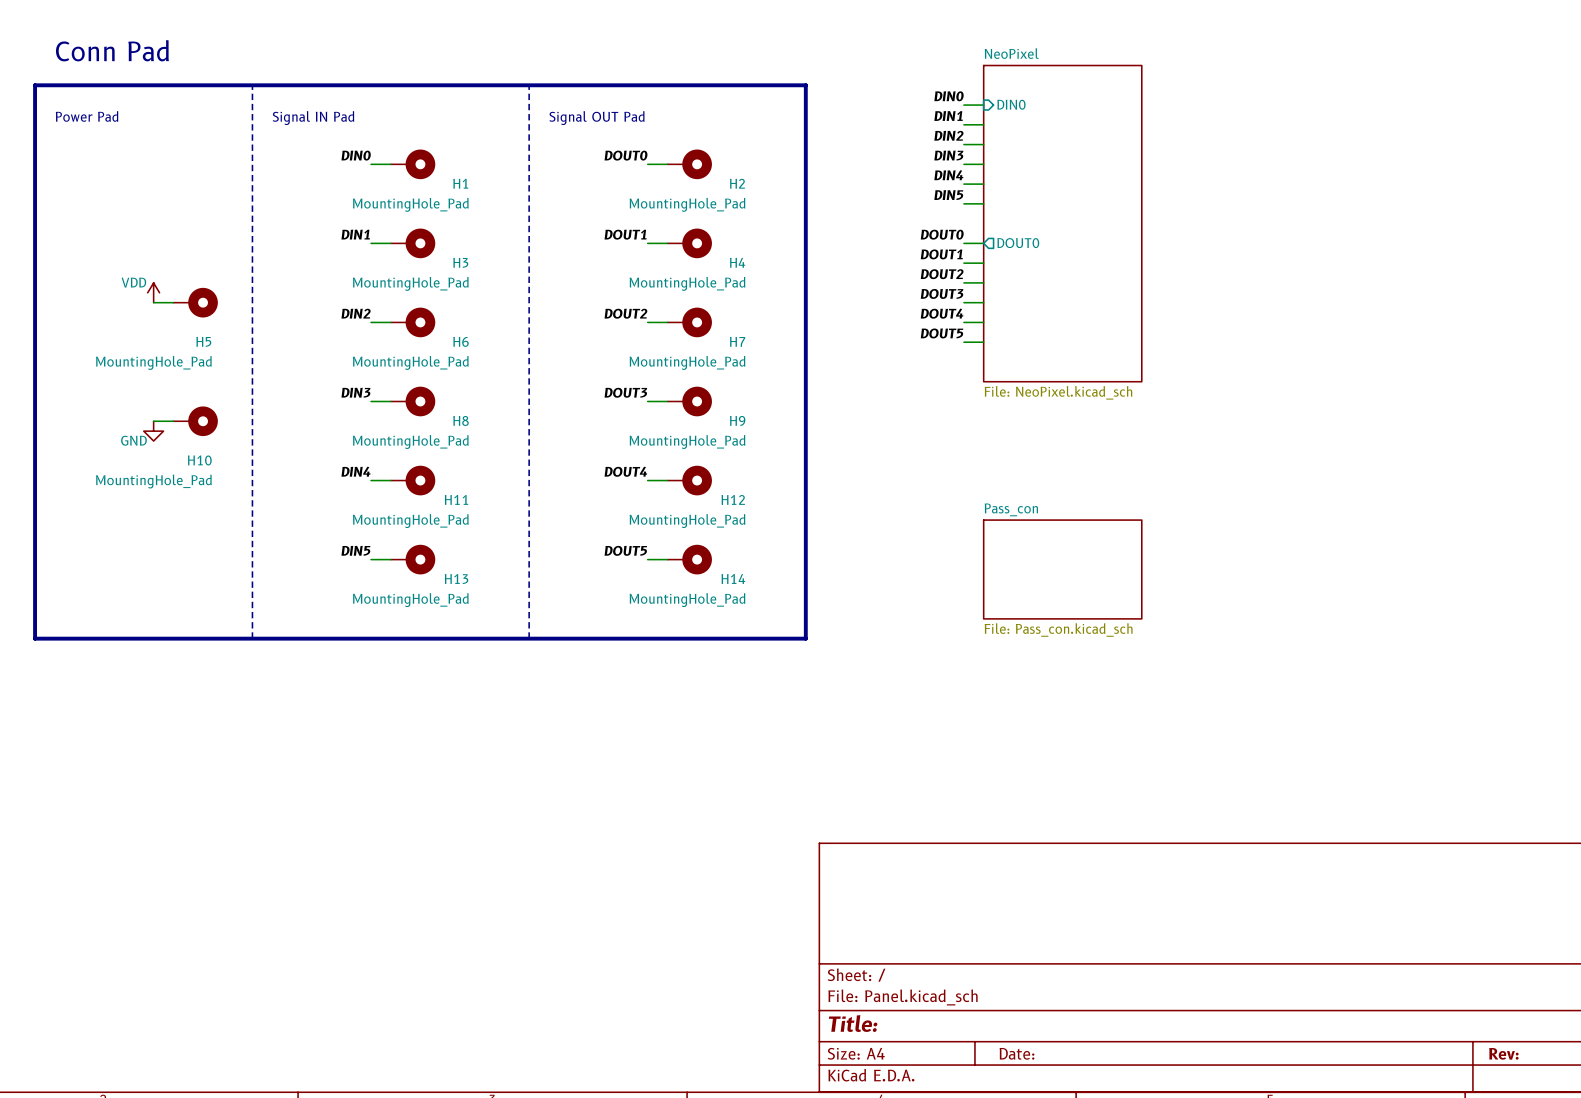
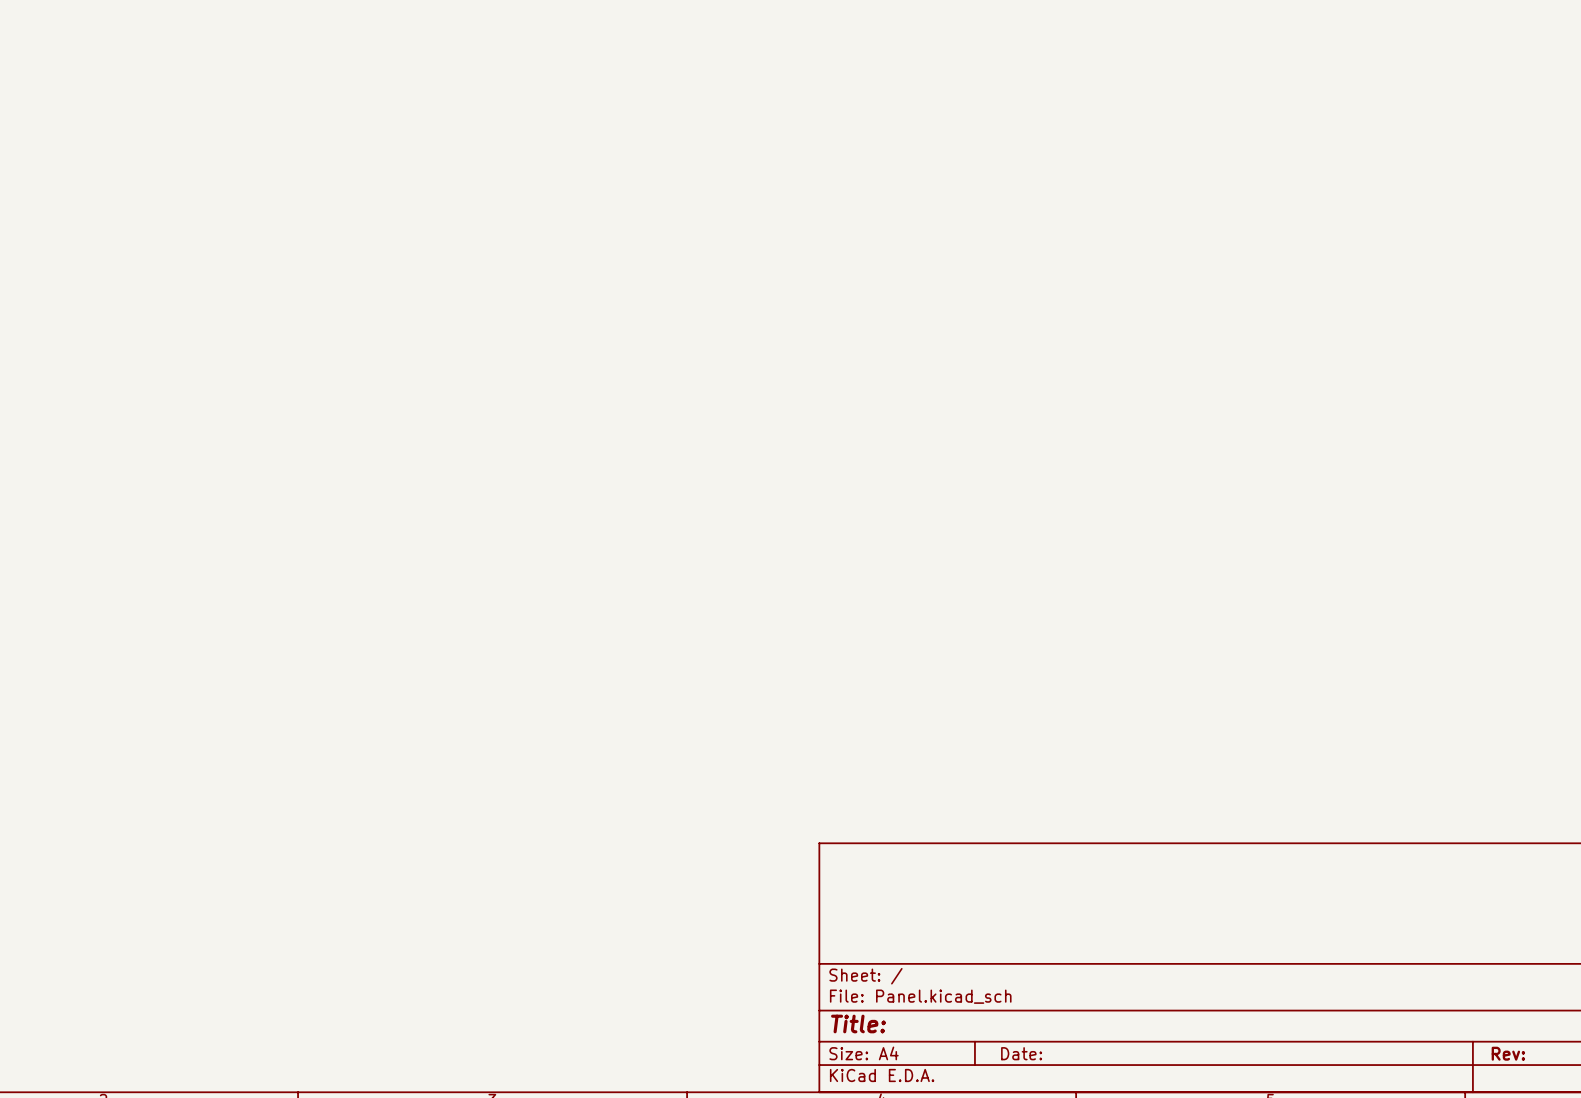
text: Conn Pad (112, 50) -> none
line: (35, 85) (805, 85) (805, 638) (35, 638) (35, 85) -> none
line: (252, 85) (252, 638) -> none
line: (529, 85) (529, 638) -> none
label: DIN0 (949, 96) -> none
sheet pin: DIN0 (1011, 104) -> none
wire: (963, 105) (983, 105) -> none
label: DIN1 (948, 115) -> none
text: Power Pad (87, 116) -> none
text: Signal IN Pad (313, 118) -> none
text: Signal OUT Pad (597, 118) -> none
wire: (963, 124) (983, 124) -> none
label: DIN2 (948, 135) -> none
wire: (963, 144) (983, 144) -> none
label: DIN0 (356, 155) -> none
label: DOUT0 (626, 155) -> none
label: DIN3 (948, 155) -> none
wire: (371, 164) (390, 164) -> none
H1: MountingHole_Pad (413, 164) -> none
wire: (647, 164) (667, 164) -> none
H2: MountingHole_Pad (689, 164) -> none
wire: (963, 164) (983, 164) -> none
label: DIN4 (948, 175) -> none
wire: (963, 184) (983, 184) -> none
label: DIN5 (948, 195) -> none
wire: (963, 203) (983, 203) -> none
sheet NeoPixel: File: NeoPixel.kicad_sch (1062, 223) -> none
label: DIN1 (355, 234) -> none
label: DOUT1 (625, 234) -> none
label: DOUT0 (942, 234) -> none
wire: (371, 243) (390, 243) -> none
H3: MountingHole_Pad (413, 243) -> none
wire: (647, 243) (667, 243) -> none
H4: MountingHole_Pad (689, 243) -> none
wire: (963, 243) (983, 243) -> none
sheet pin: DOUT0 (1018, 243) -> none
label: DOUT1 (941, 254) -> none
wire: (963, 263) (983, 263) -> none
label: DOUT2 (942, 274) -> none
wire: (963, 282) (983, 282) -> none
power symbol: VDD (153, 292) -> none
label: DOUT3 (942, 293) -> none
wire: (153, 302) (173, 302) -> none
H5: MountingHole_Pad (195, 302) -> none
wire: (963, 302) (983, 302) -> none
label: DIN2 (356, 313) -> none
label: DOUT2 (625, 313) -> none
label: DOUT4 (942, 313) -> none
wire: (371, 322) (390, 322) -> none
H6: MountingHole_Pad (413, 322) -> none
wire: (647, 322) (667, 322) -> none
H7: MountingHole_Pad (689, 322) -> none
wire: (963, 322) (983, 322) -> none
label: DOUT5 (942, 333) -> none
wire: (963, 342) (983, 342) -> none
label: DIN3 (355, 392) -> none
label: DOUT3 (625, 392) -> none
wire: (371, 401) (390, 401) -> none
H8: MountingHole_Pad (413, 401) -> none
wire: (647, 401) (667, 401) -> none
H9: MountingHole_Pad (689, 401) -> none
wire: (153, 421) (173, 421) -> none
H10: MountingHole_Pad (195, 421) -> none
power symbol: GND (153, 431) -> none
label: DIN4 (355, 471) -> none
label: DOUT4 (625, 471) -> none
wire: (371, 480) (390, 480) -> none
H11: MountingHole_Pad (413, 480) -> none
wire: (647, 480) (667, 480) -> none
H12: MountingHole_Pad (689, 480) -> none
label: DIN5 (355, 550) -> none
label: DOUT5 (625, 550) -> none
wire: (371, 559) (390, 559) -> none
H13: MountingHole_Pad (413, 559) -> none
wire: (647, 559) (667, 559) -> none
H14: MountingHole_Pad (689, 559) -> none
sheet Pass_con: File: Pass_con.kicad_sch (1062, 569) -> none

